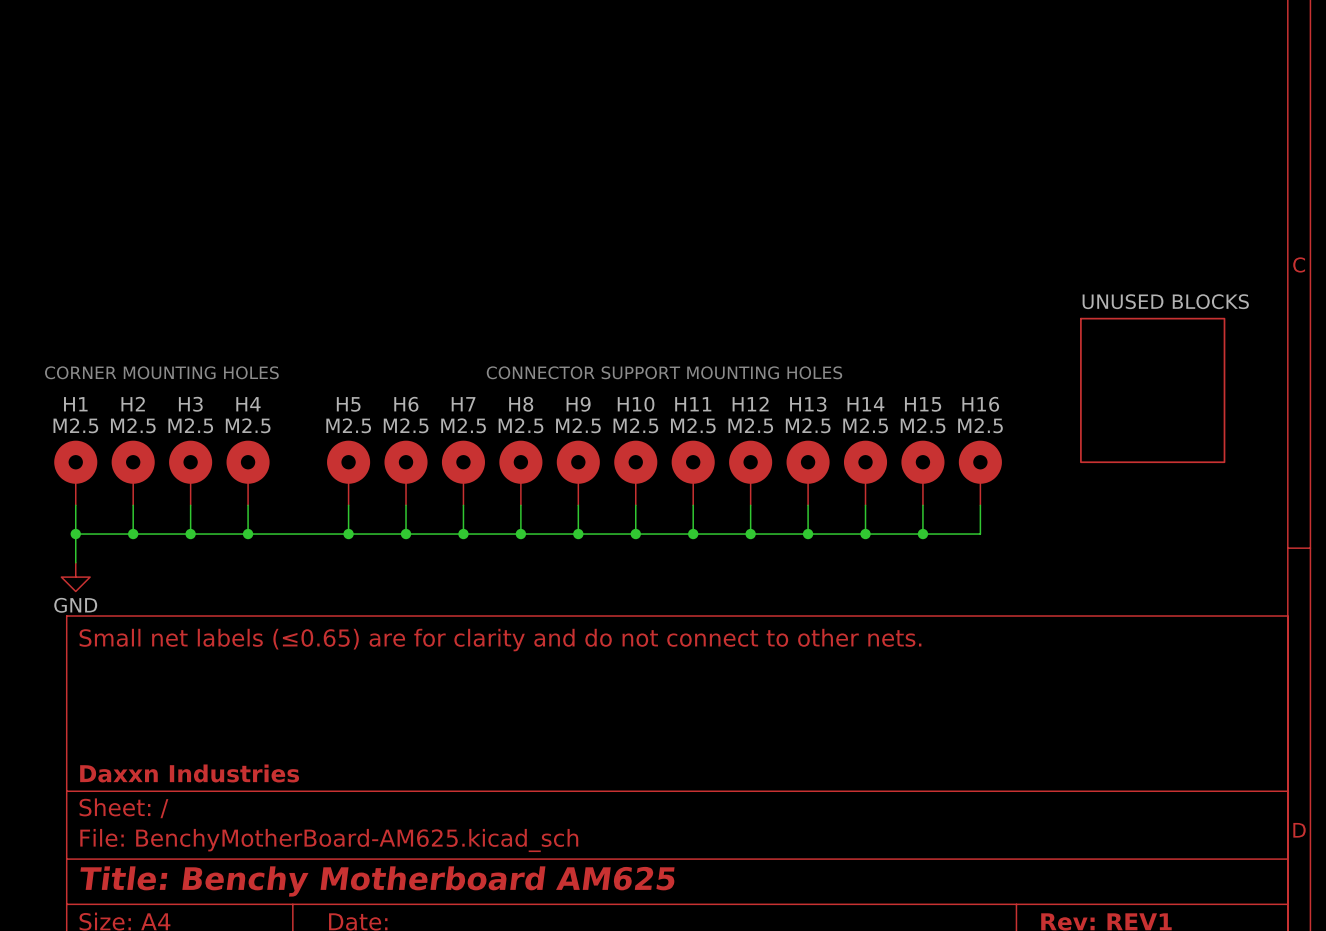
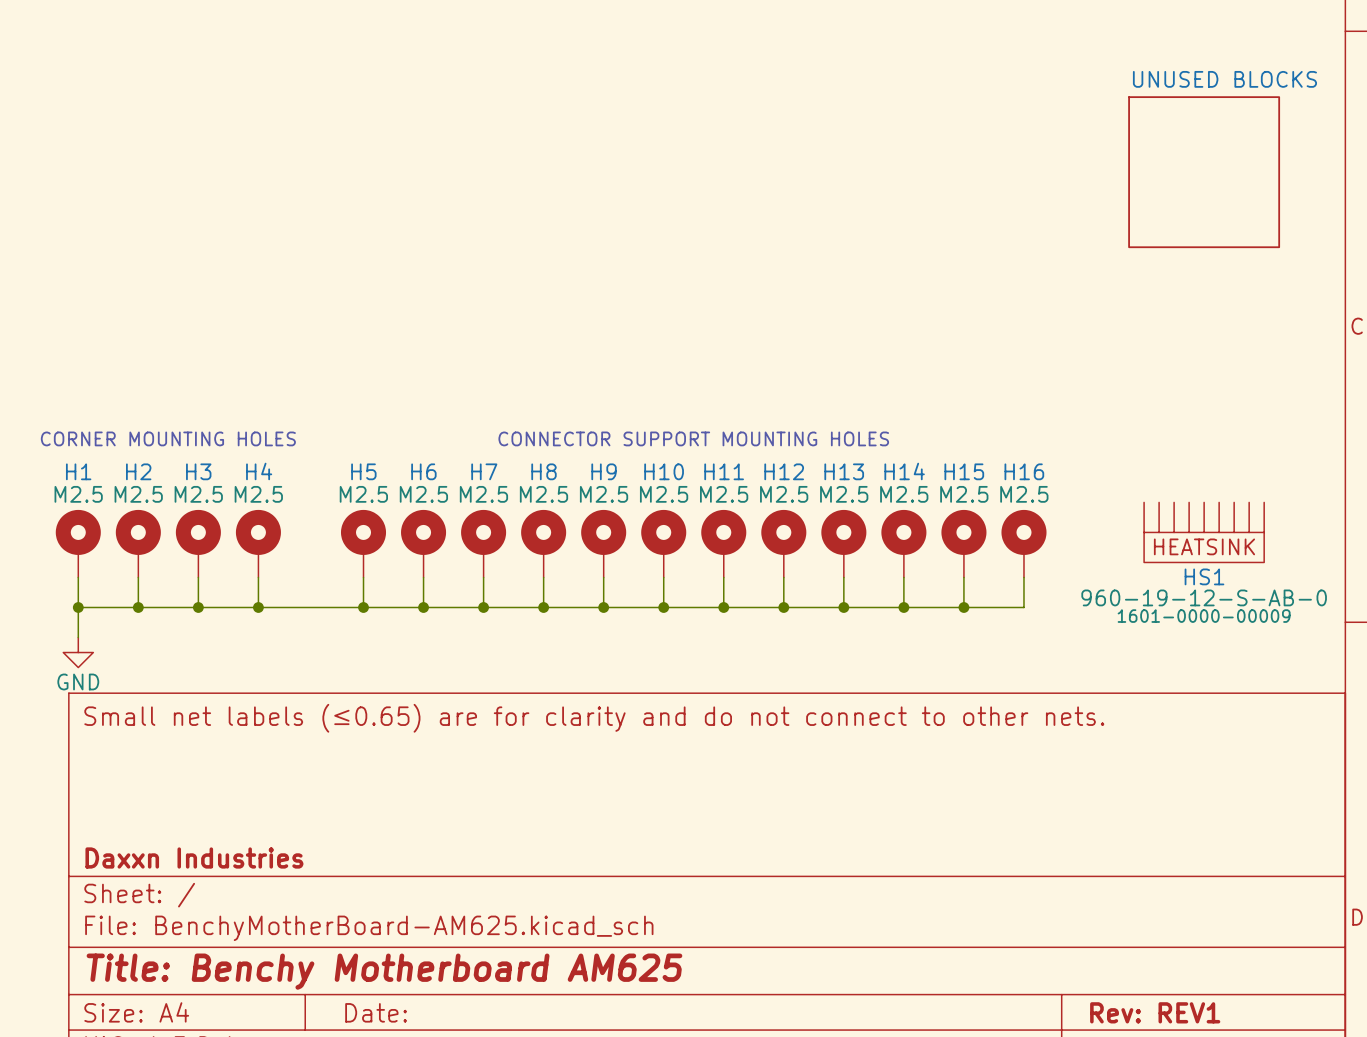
sheet UNUSED BLOCKS position: (1152, 390) -> (1204, 172)
HS1: none -> 960-19-12-S-AB-0 (1204, 532)

